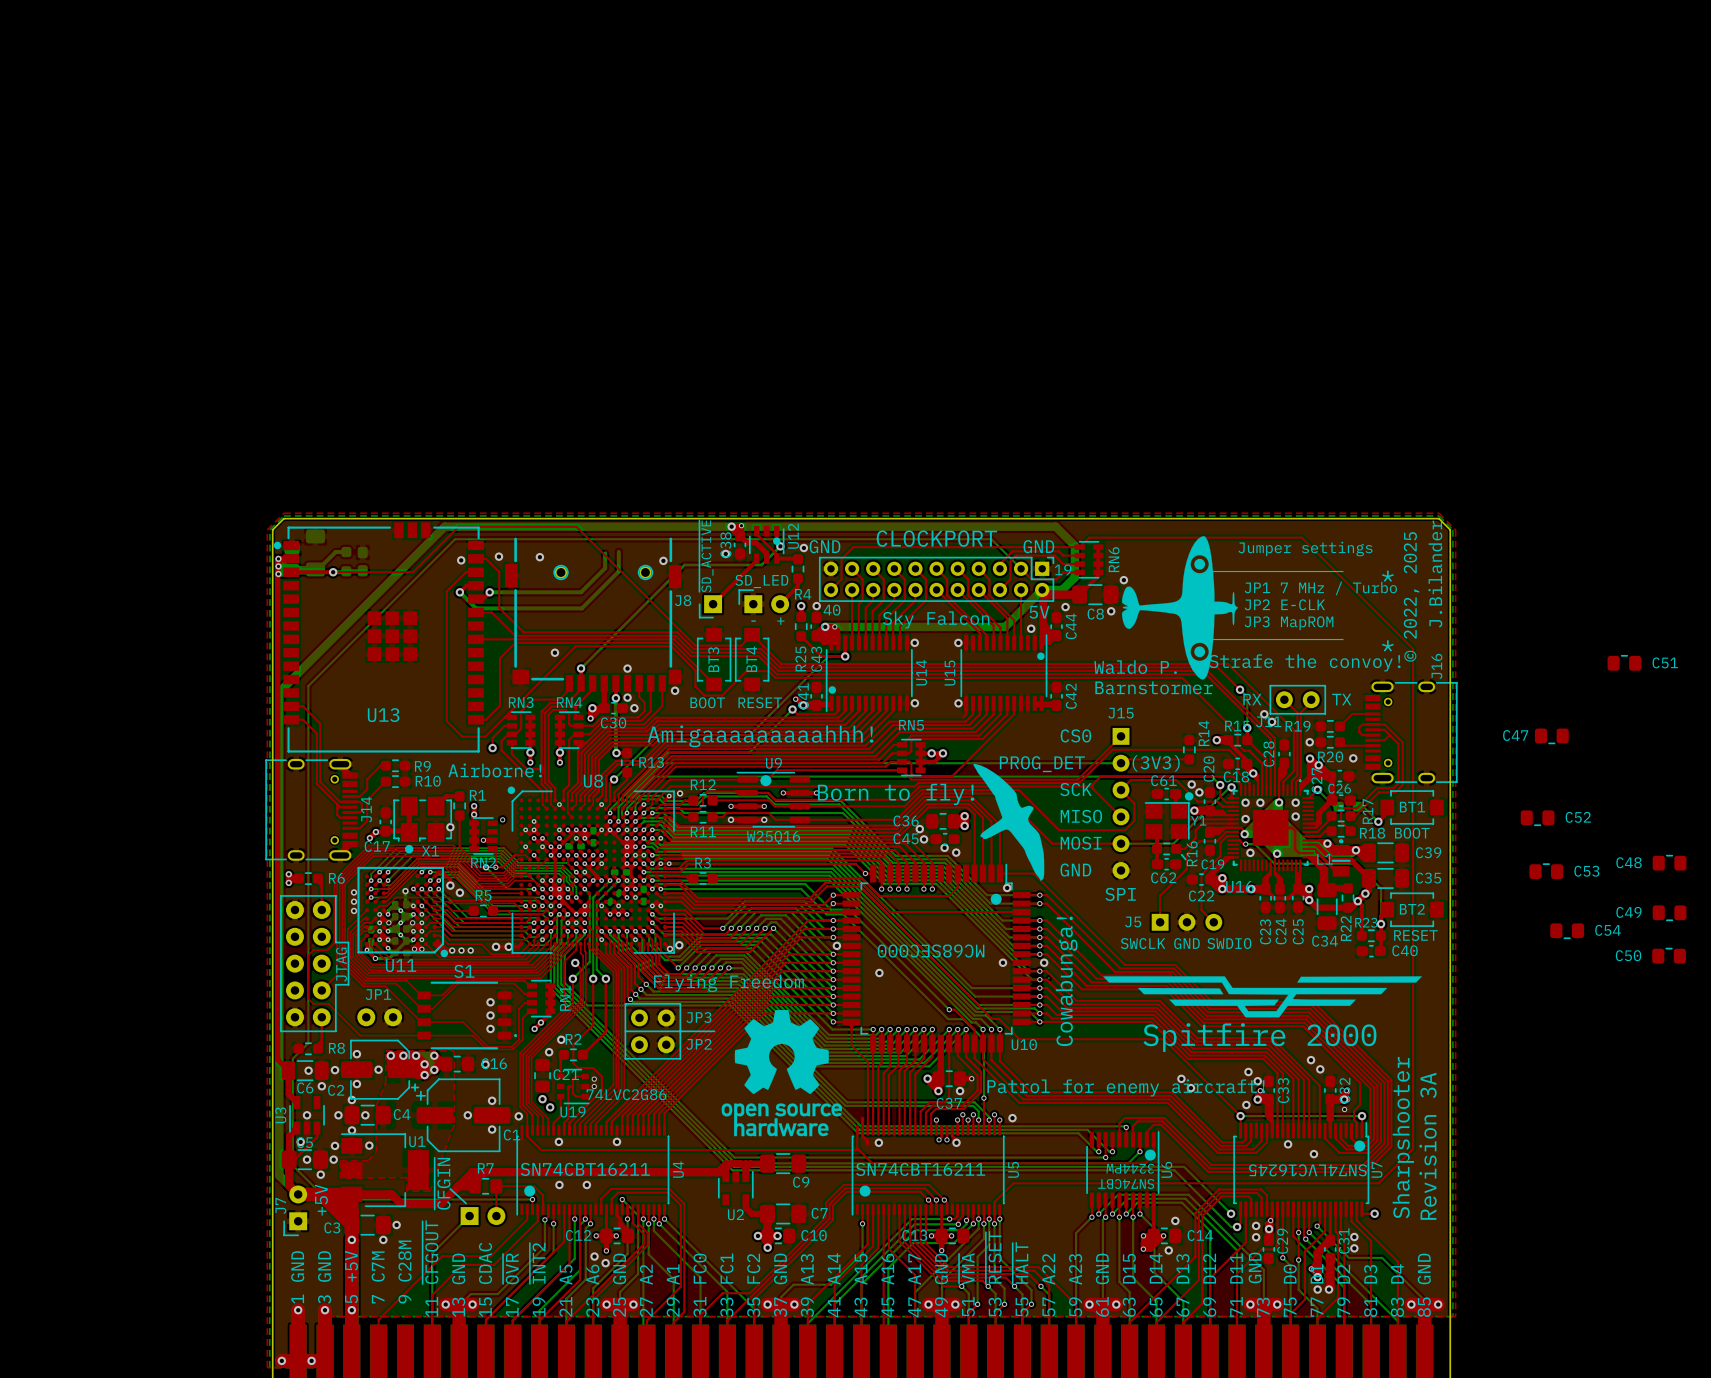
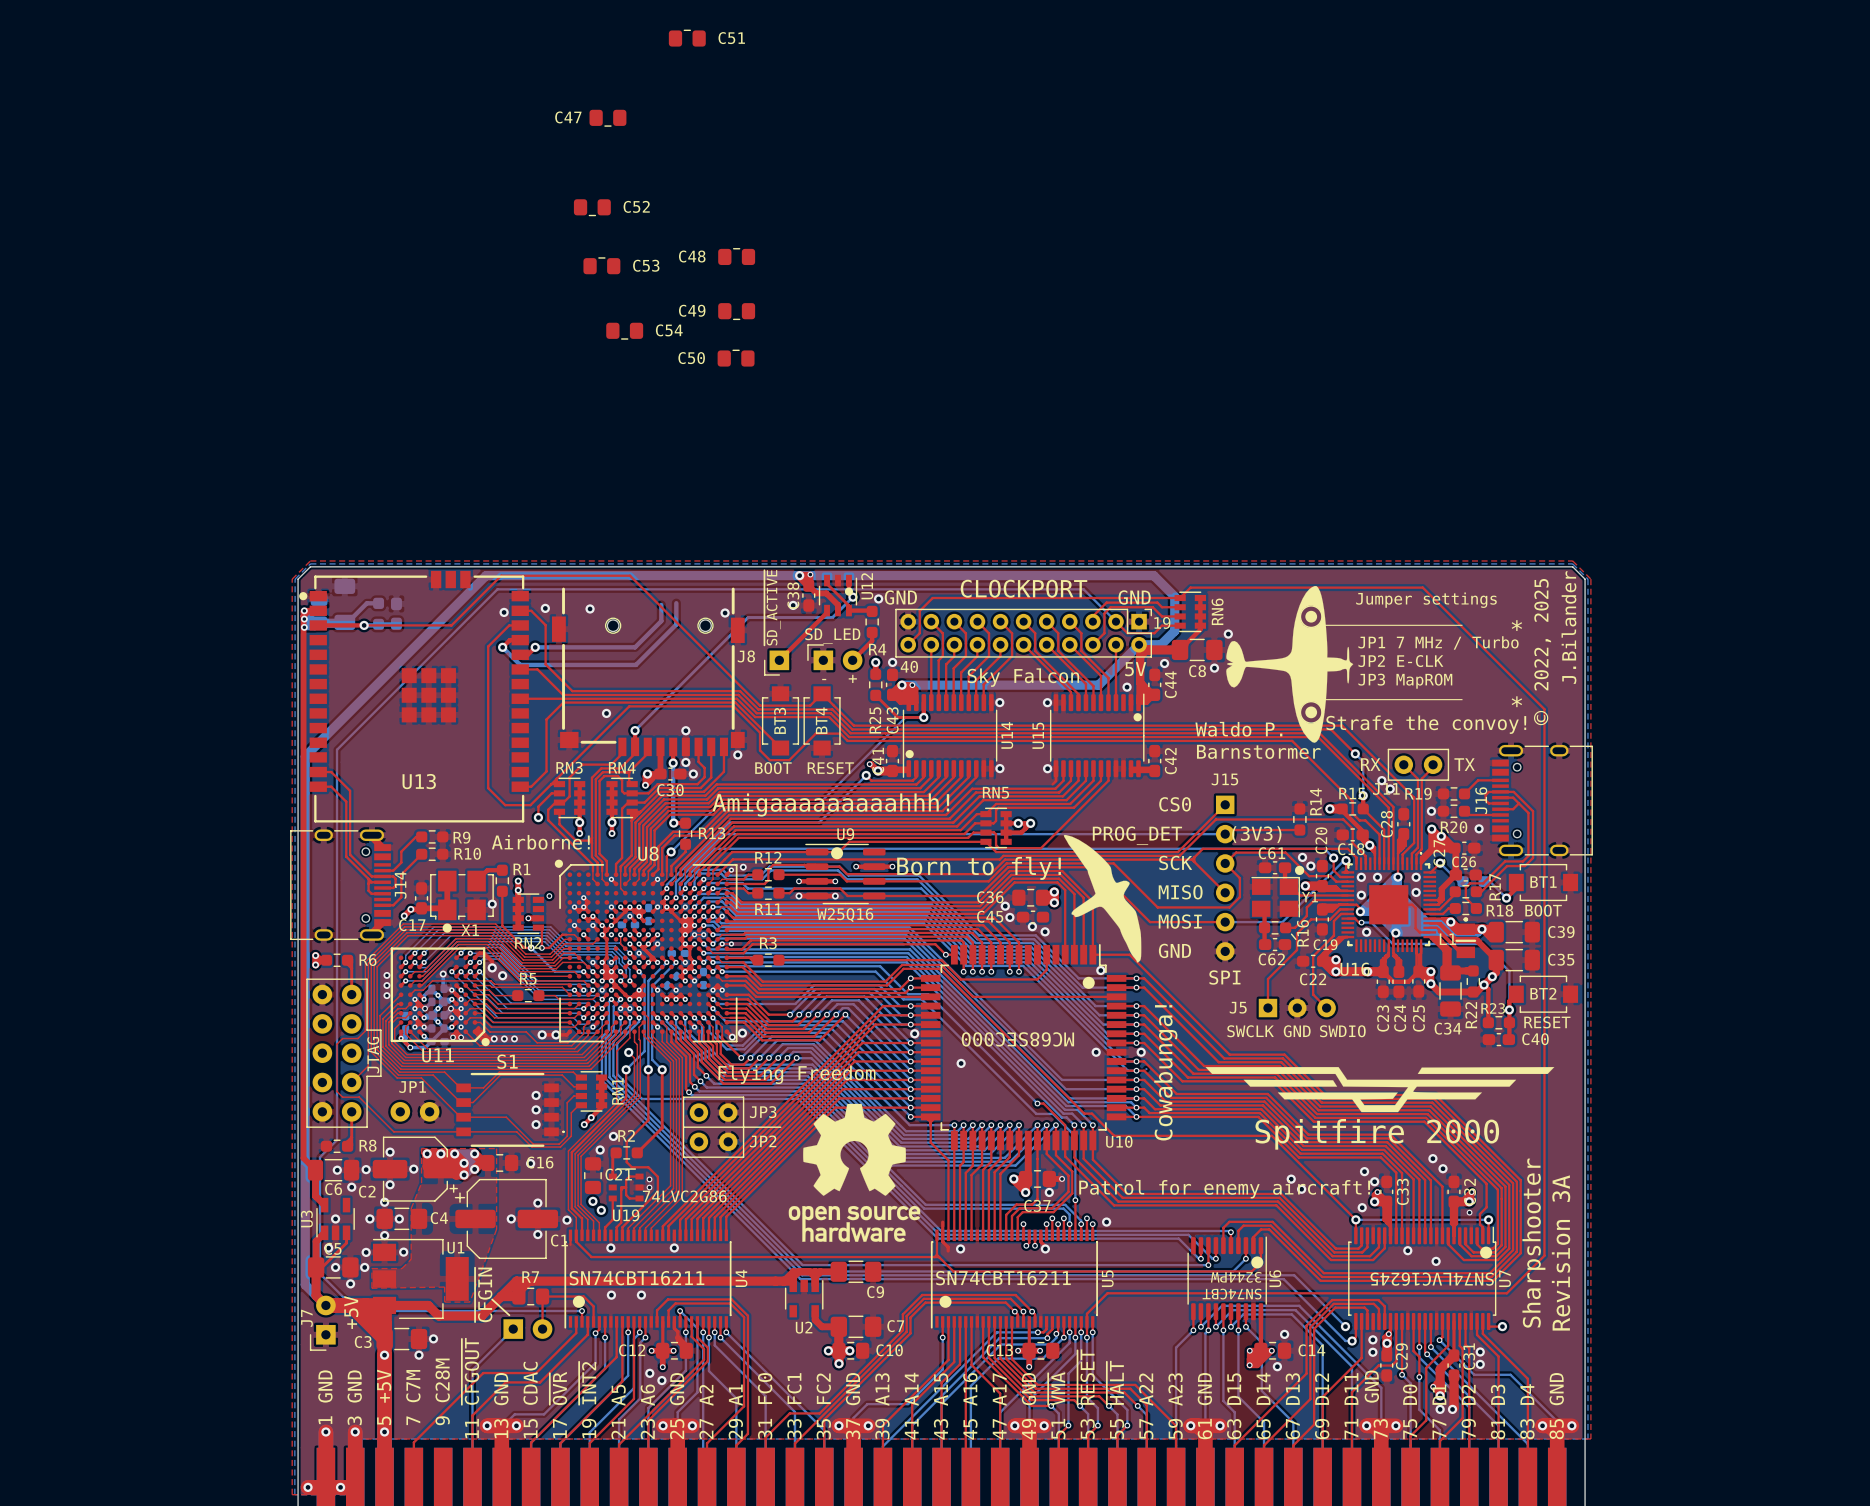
text: © 2022, 2025 (1411, 596) -> 2022, 2025 (1542, 634)
text: none -> © (1541, 718)
C51 position: (1624, 662) -> (687, 38)
J16 name position: J16 (1436, 666) -> J16 (1481, 800)
C47 position: (1551, 736) -> (607, 118)
C52 position: (1537, 818) -> (592, 207)
C48 position: (1669, 862) -> (736, 256)
C53 position: (1546, 871) -> (601, 265)
C49 position: (1669, 913) -> (736, 311)
C54 position: (1567, 931) -> (624, 331)
C50 position: (1669, 955) -> (736, 358)

